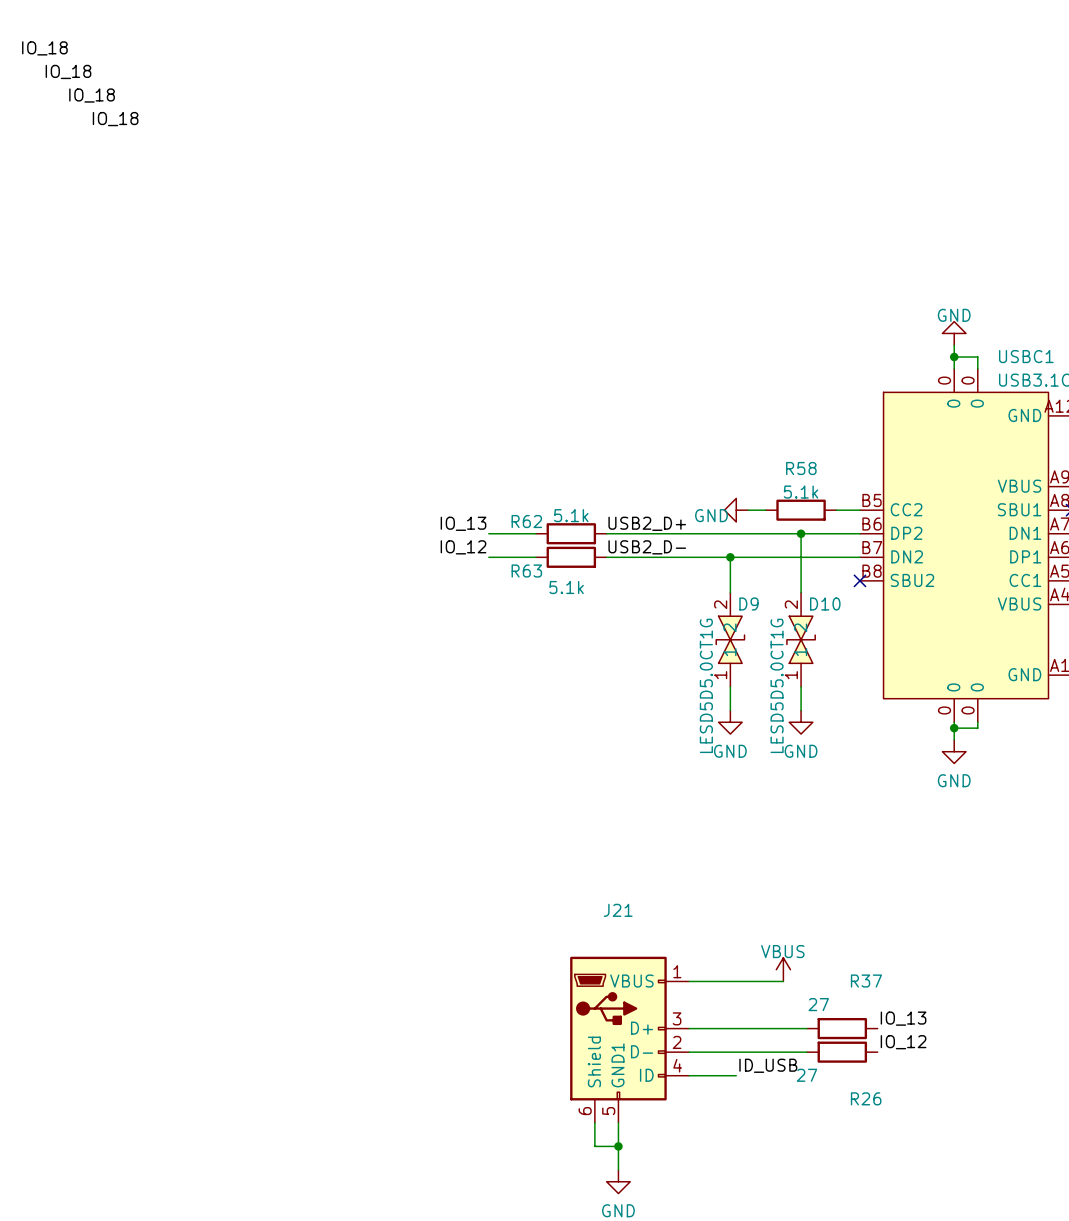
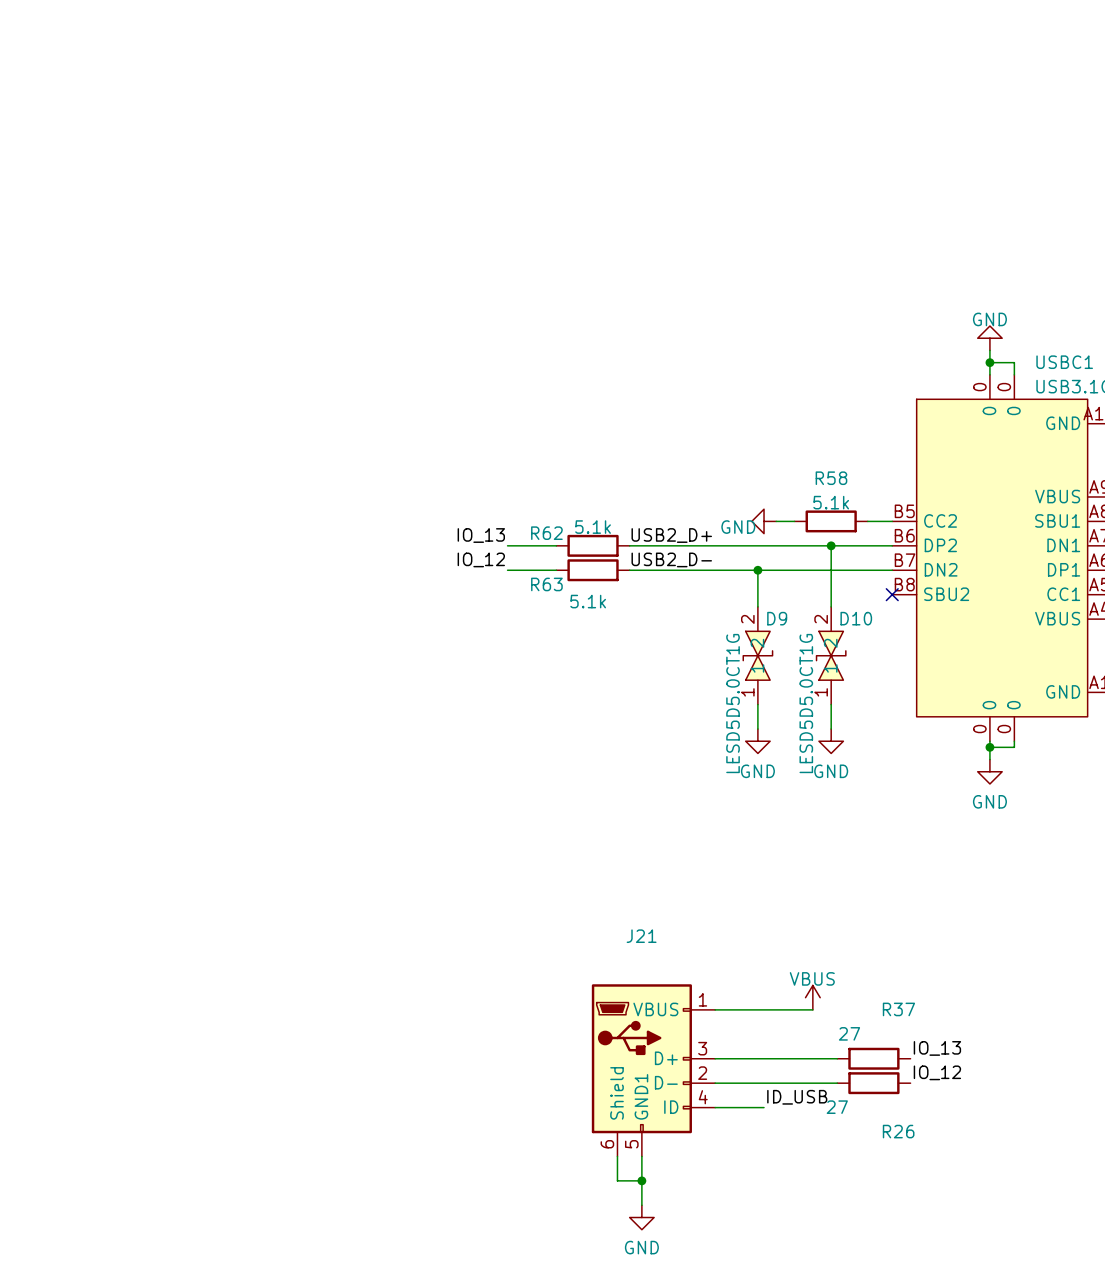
label: IO_18 (44, 48) -> none
label: IO_18 (68, 71) -> none
label: IO_18 (92, 95) -> none
label: IO_18 (115, 119) -> none

